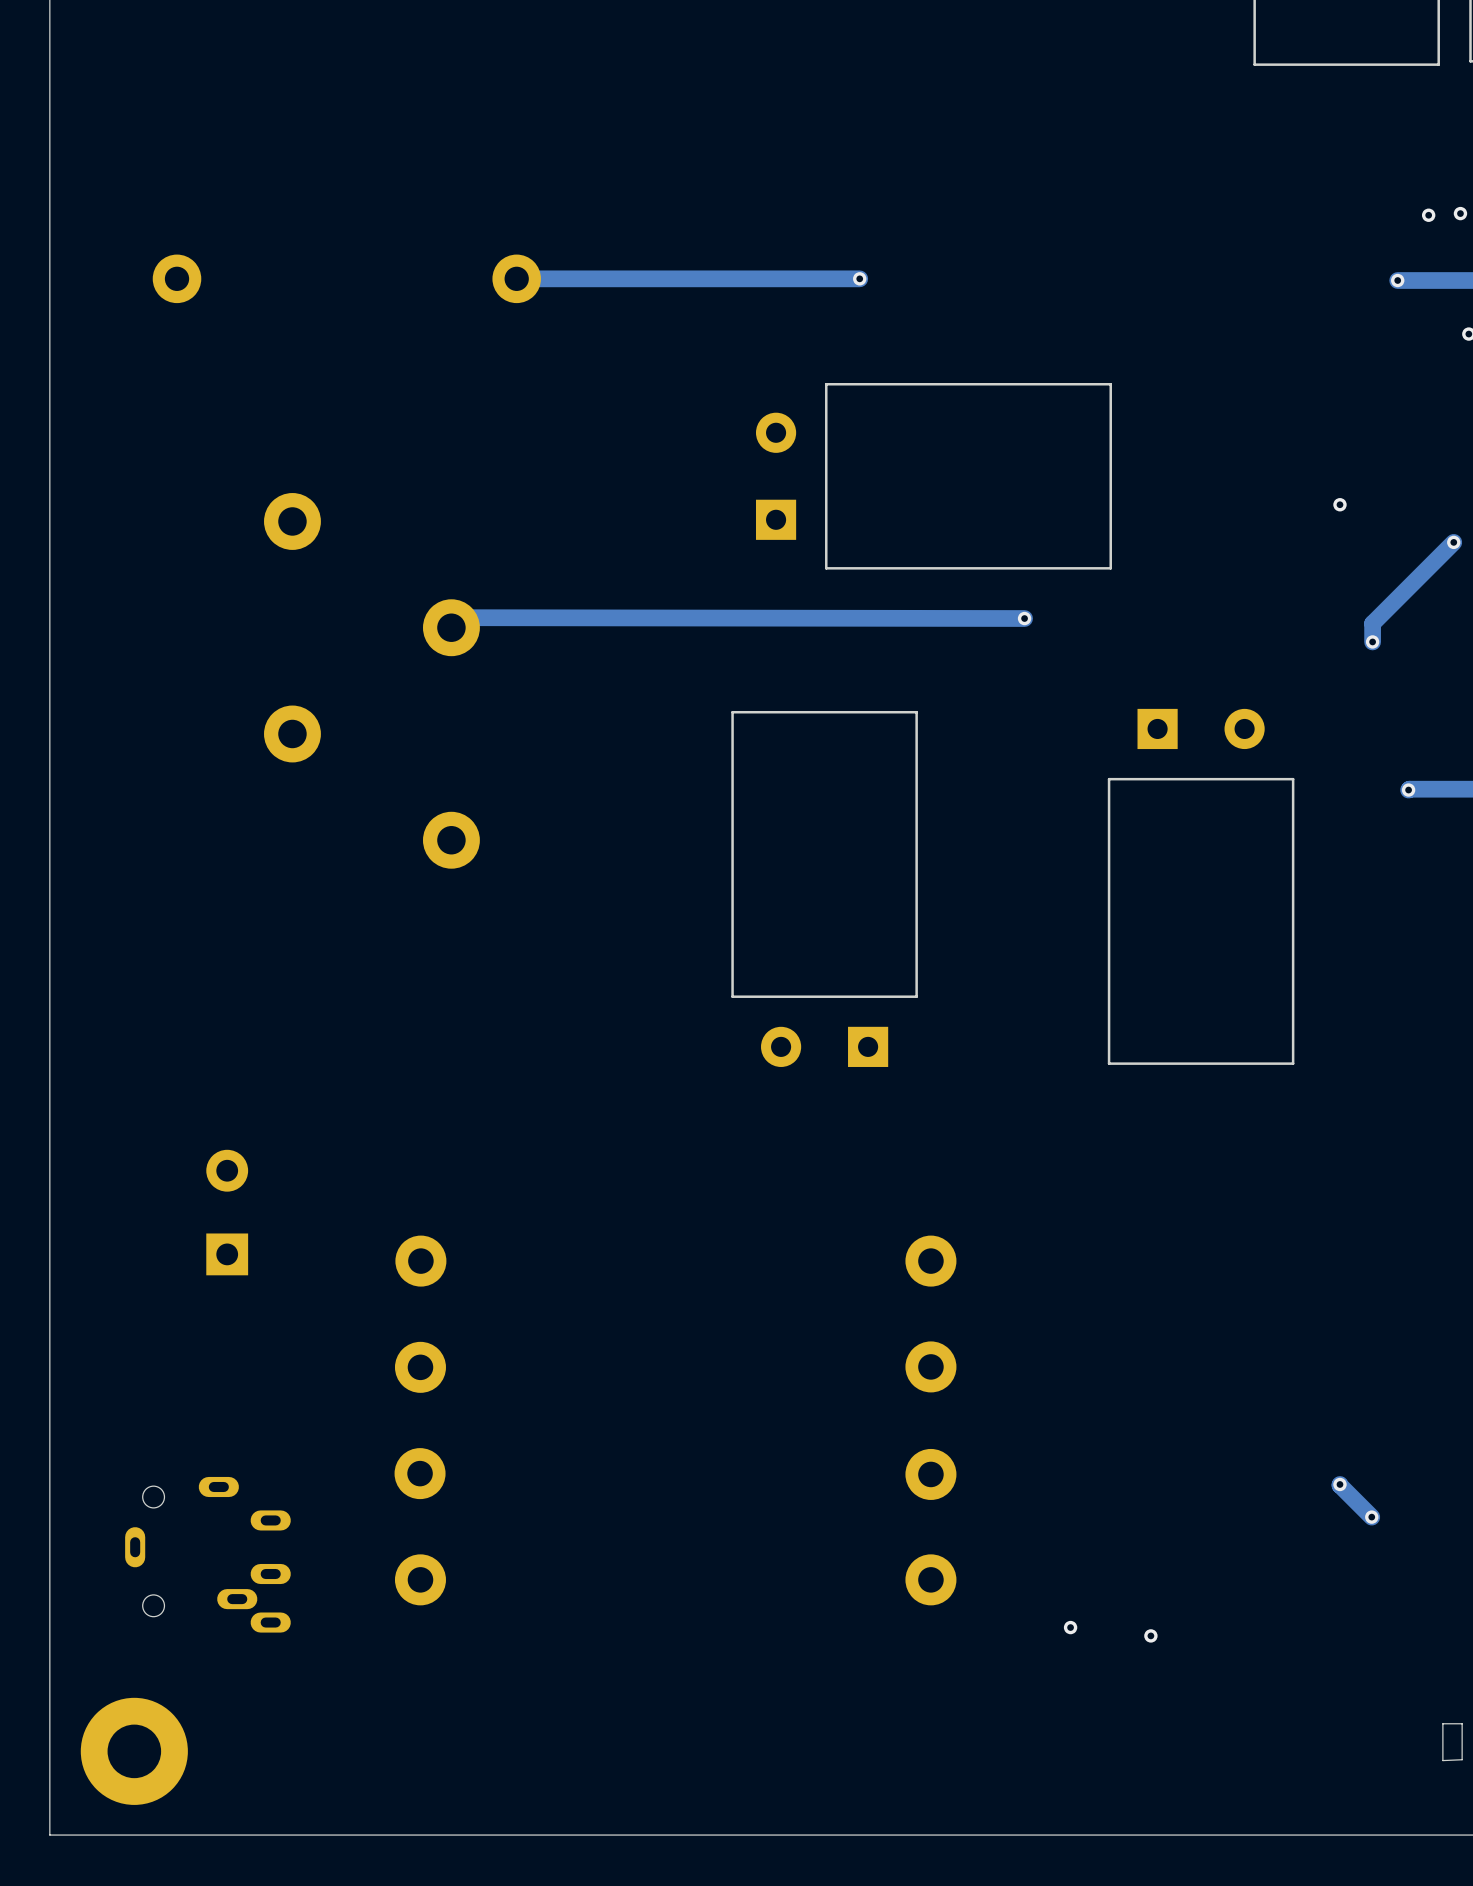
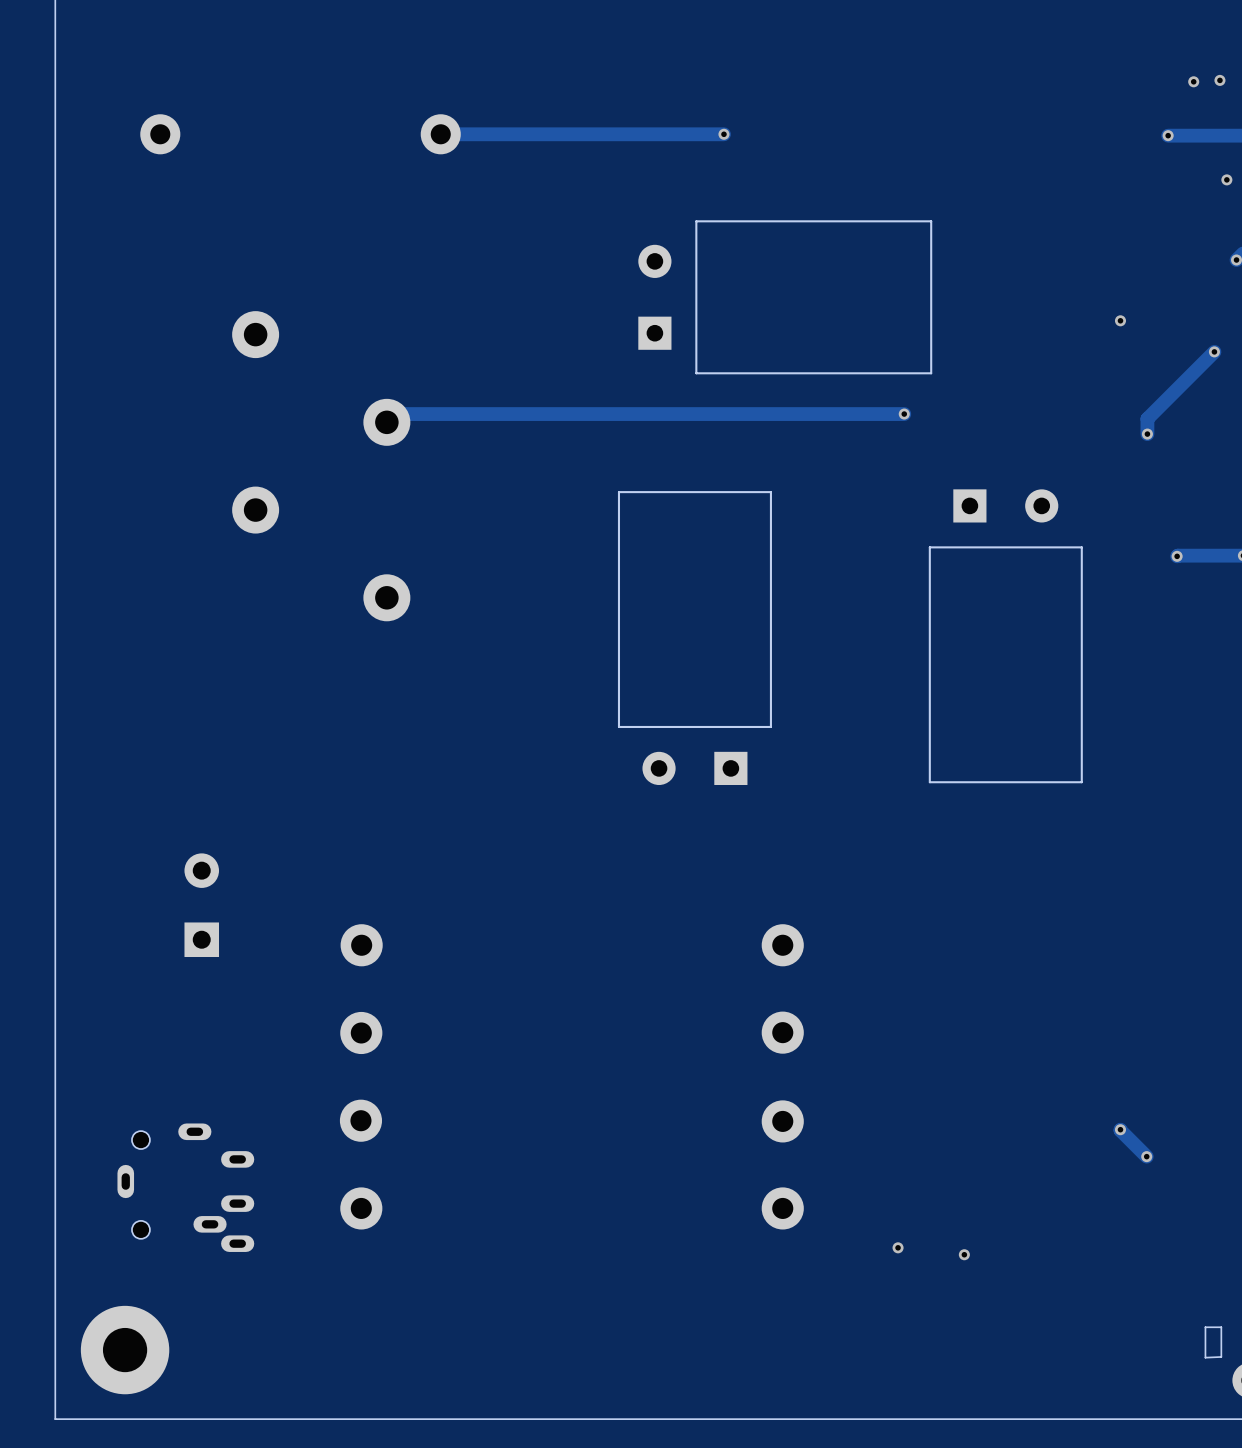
track: (459, 617) (1024, 618) -> (393, 414) (904, 414)
via position: (1024, 618) -> (904, 414)

